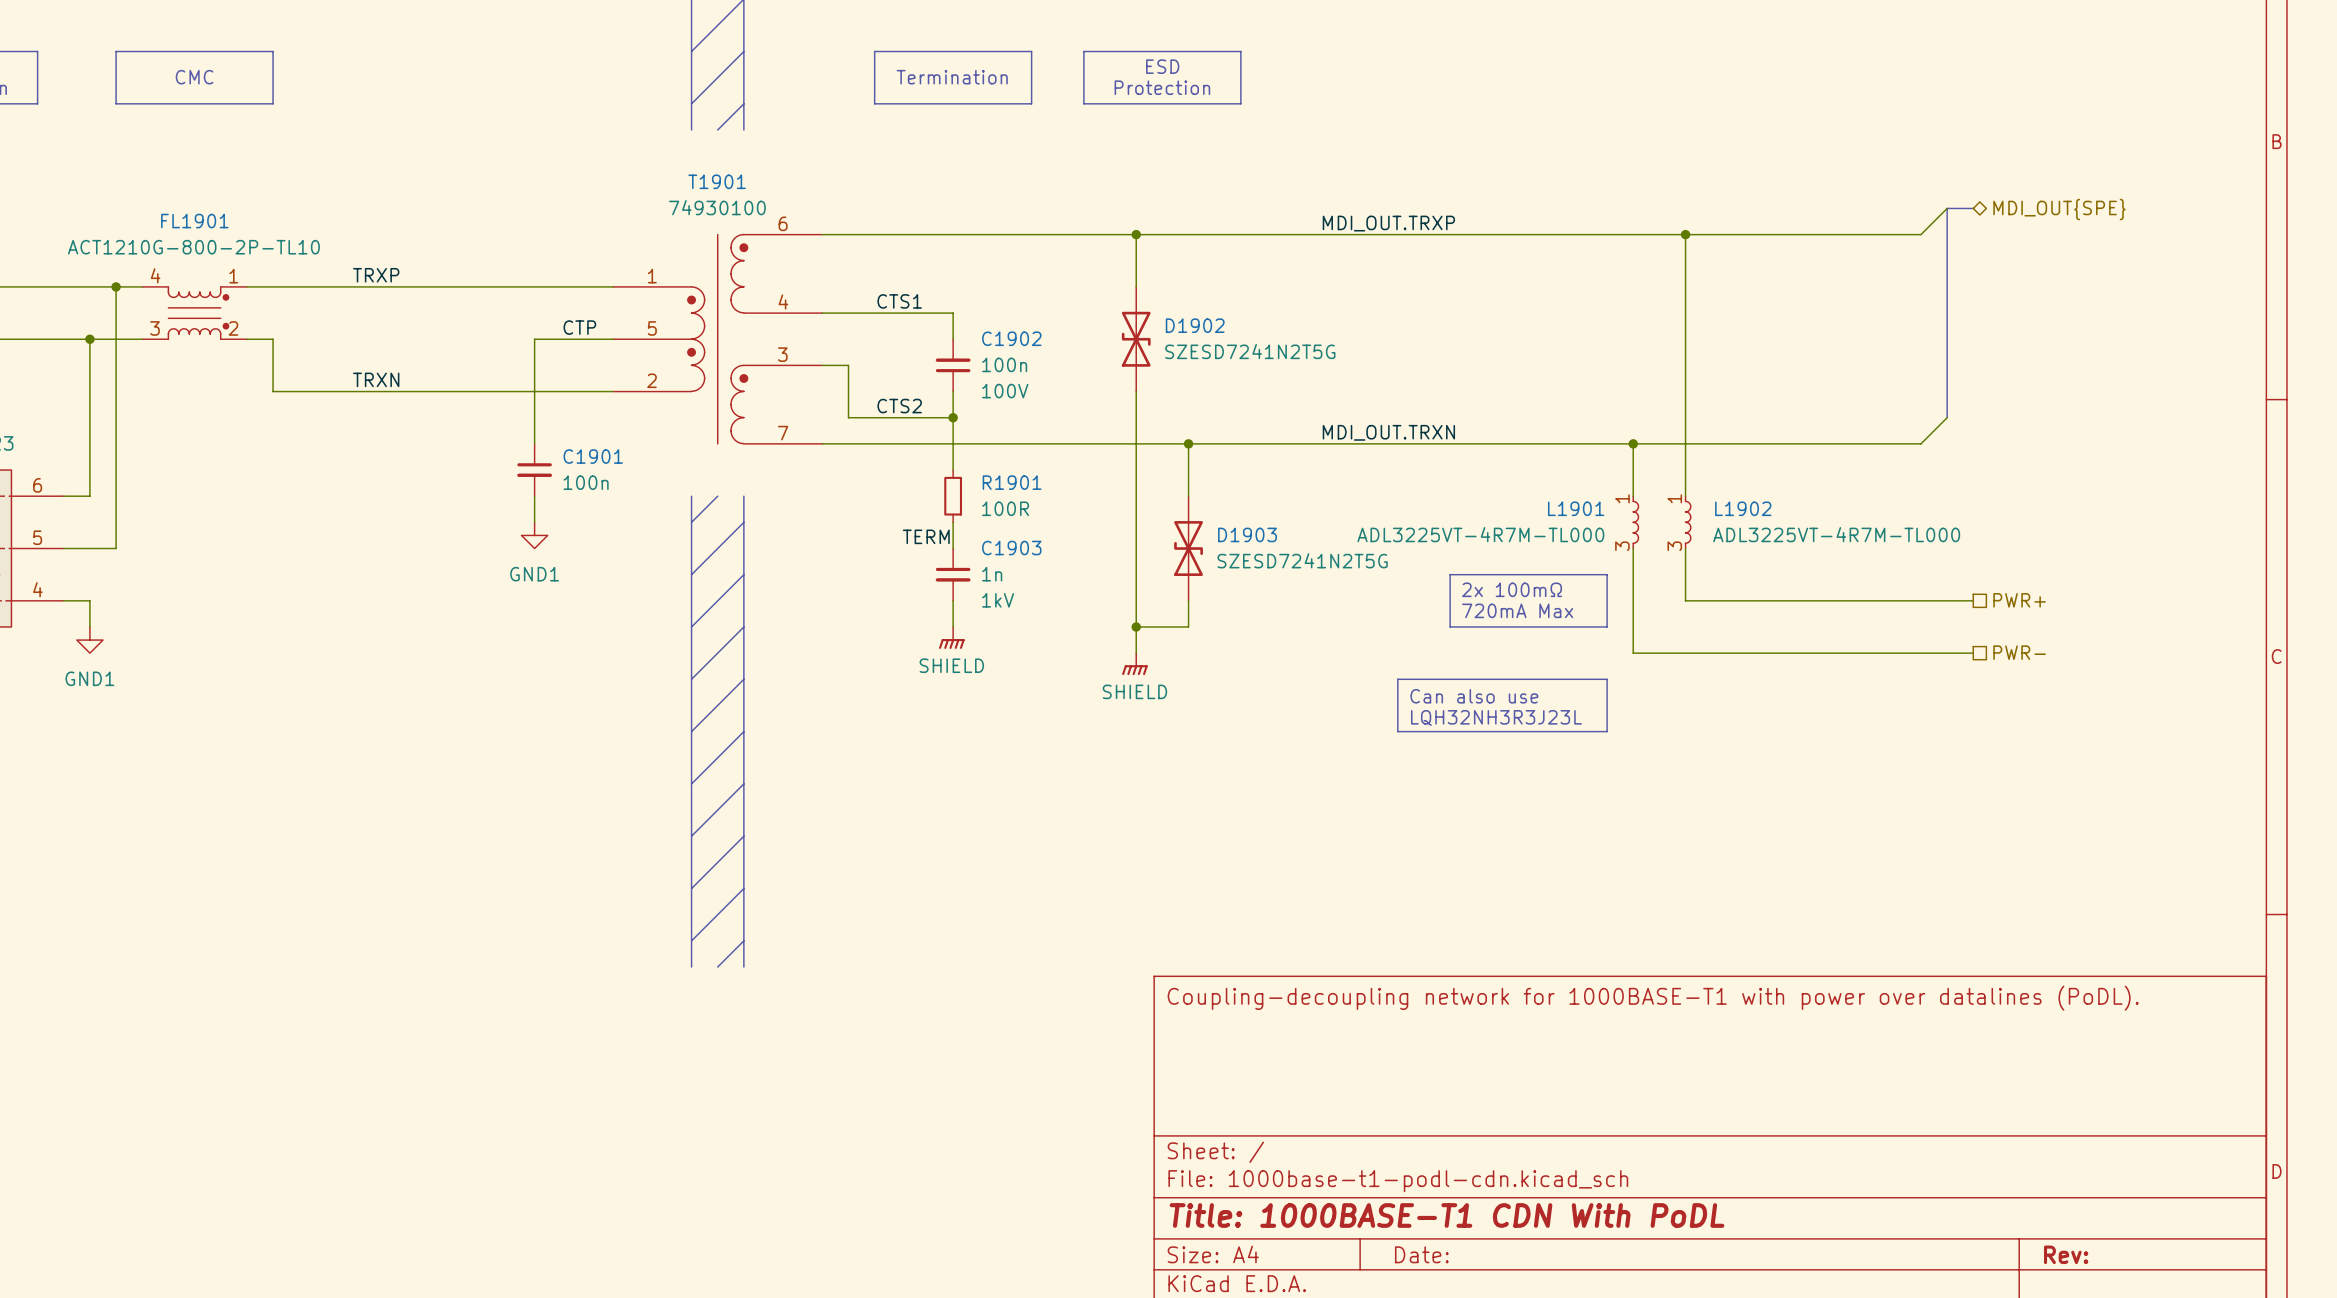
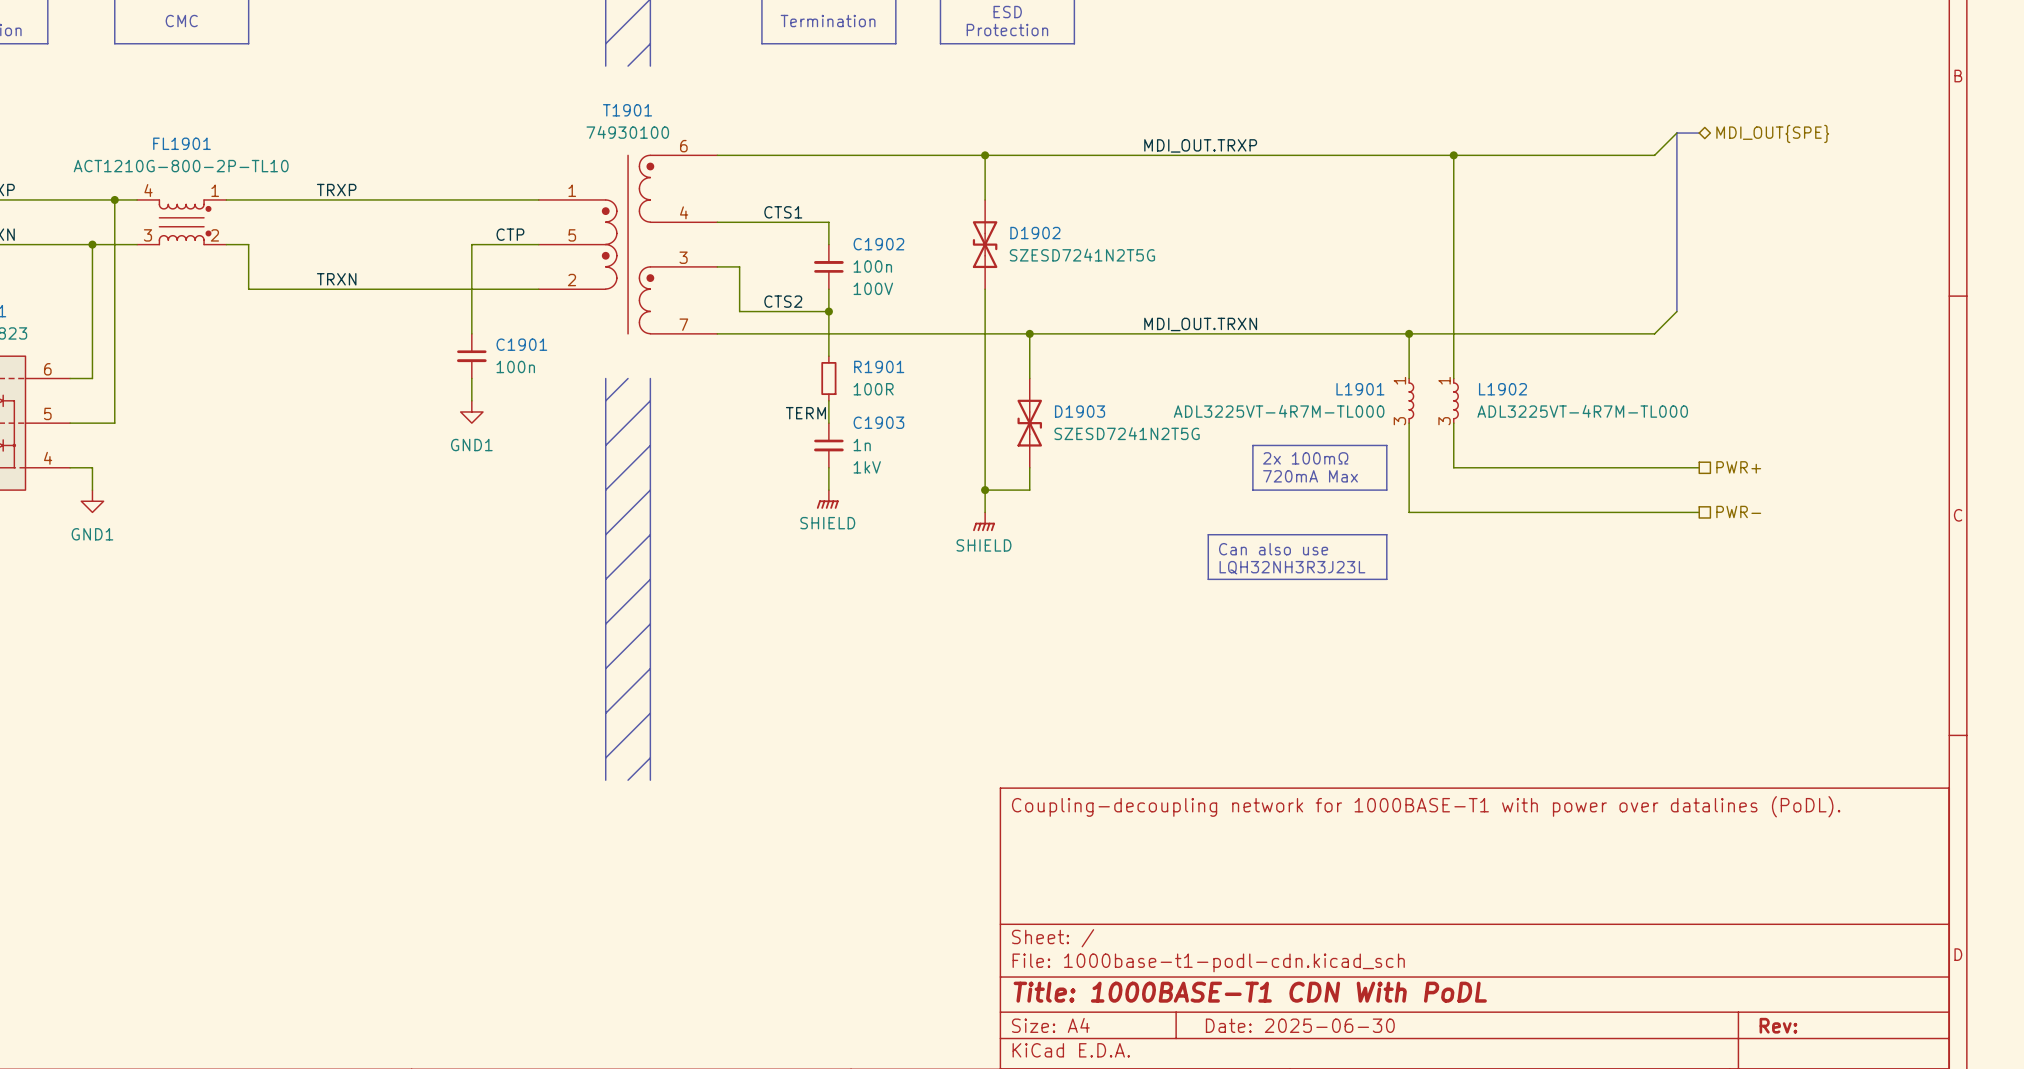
title block: Date: (1421, 1254) -> Date: 2025-06-30 (1300, 1025)

